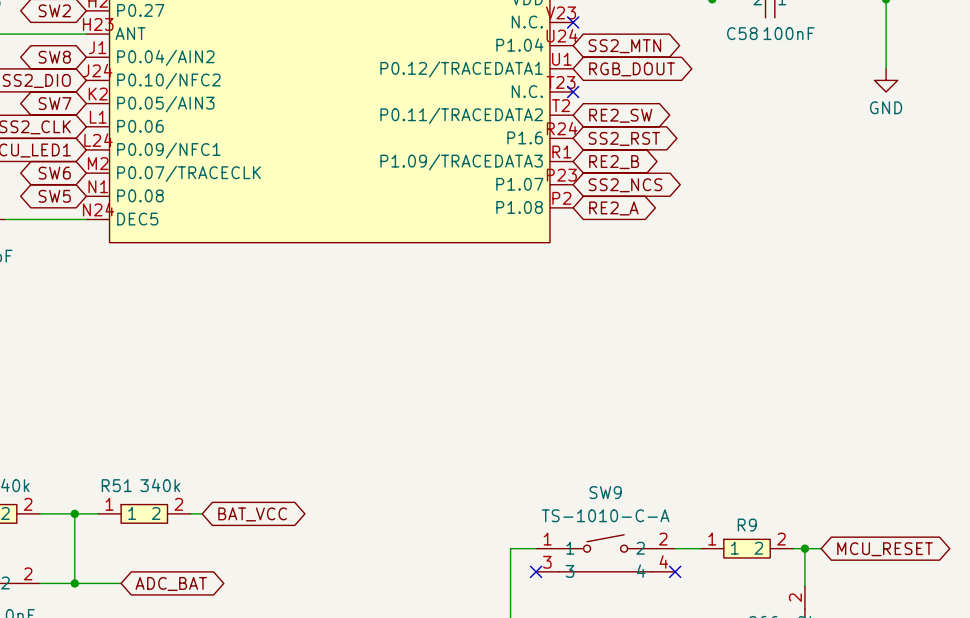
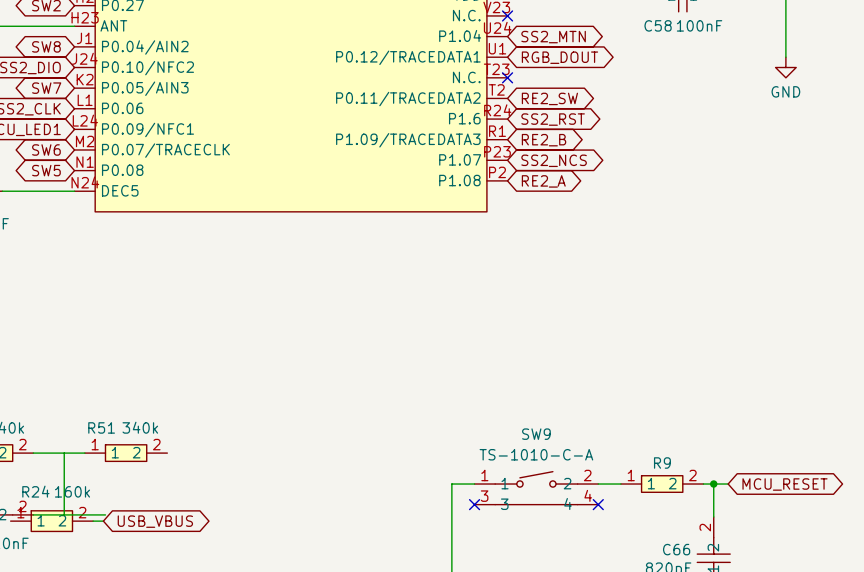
junction: (74, 513) -> none
wire: (190, 513) (202, 513) -> (93, 521) (103, 521)
global label: BAT_VCC (252, 514) -> none
junction: (74, 583) -> none
global label: ADC_BAT (171, 583) -> USB_VBUS (155, 521)
R24: none -> (51, 521)

